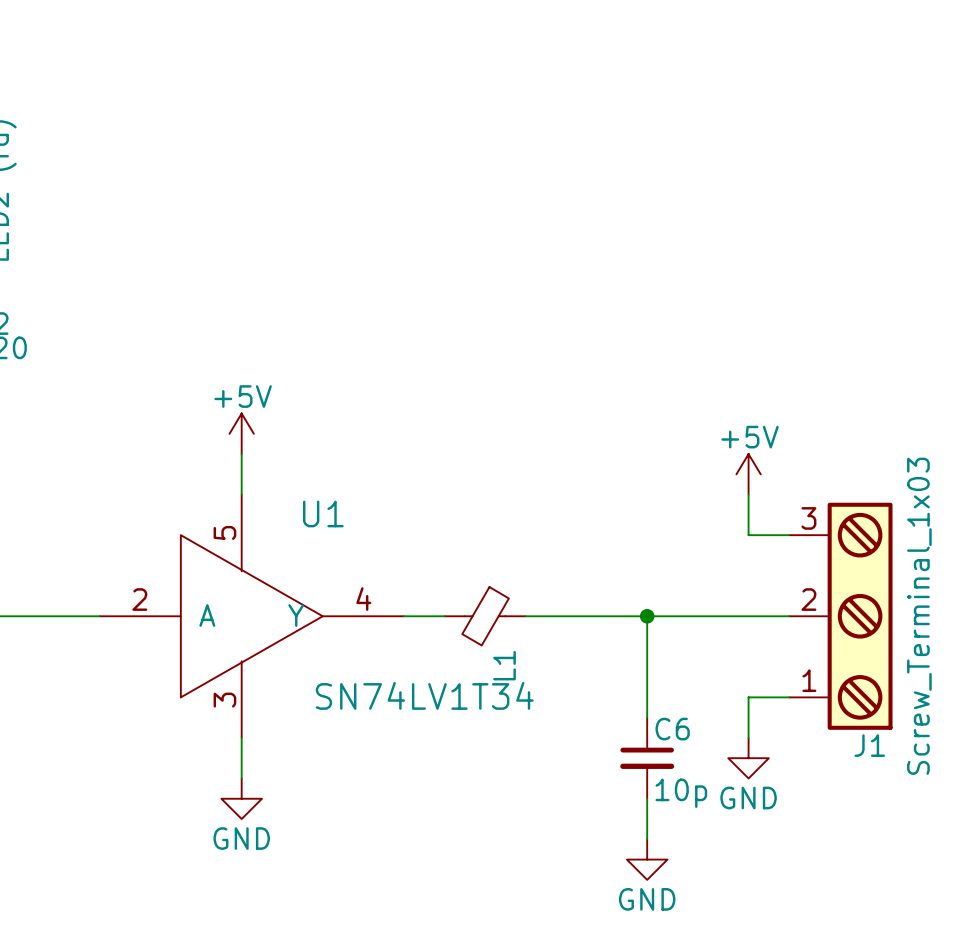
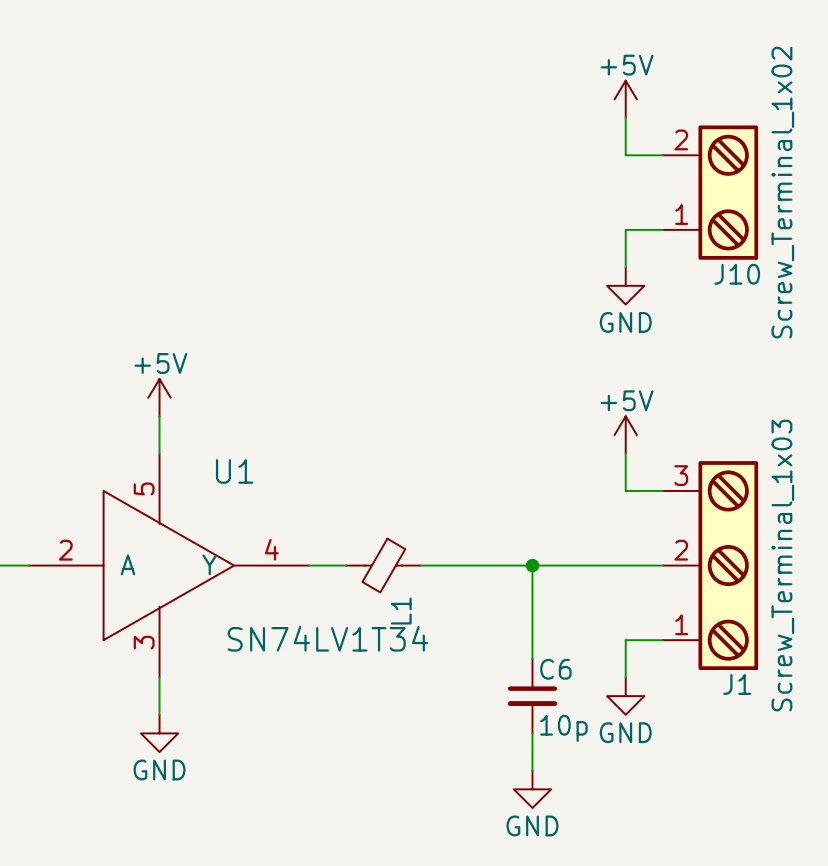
power symbol: none -> +5V (625, 99)
wire: none -> (625, 118) (625, 155) (663, 155)
J10: none -> Screw_Terminal_1x02 (710, 192)
wire: none -> (663, 229) (625, 229) (625, 267)
power symbol: none -> GND (625, 285)

